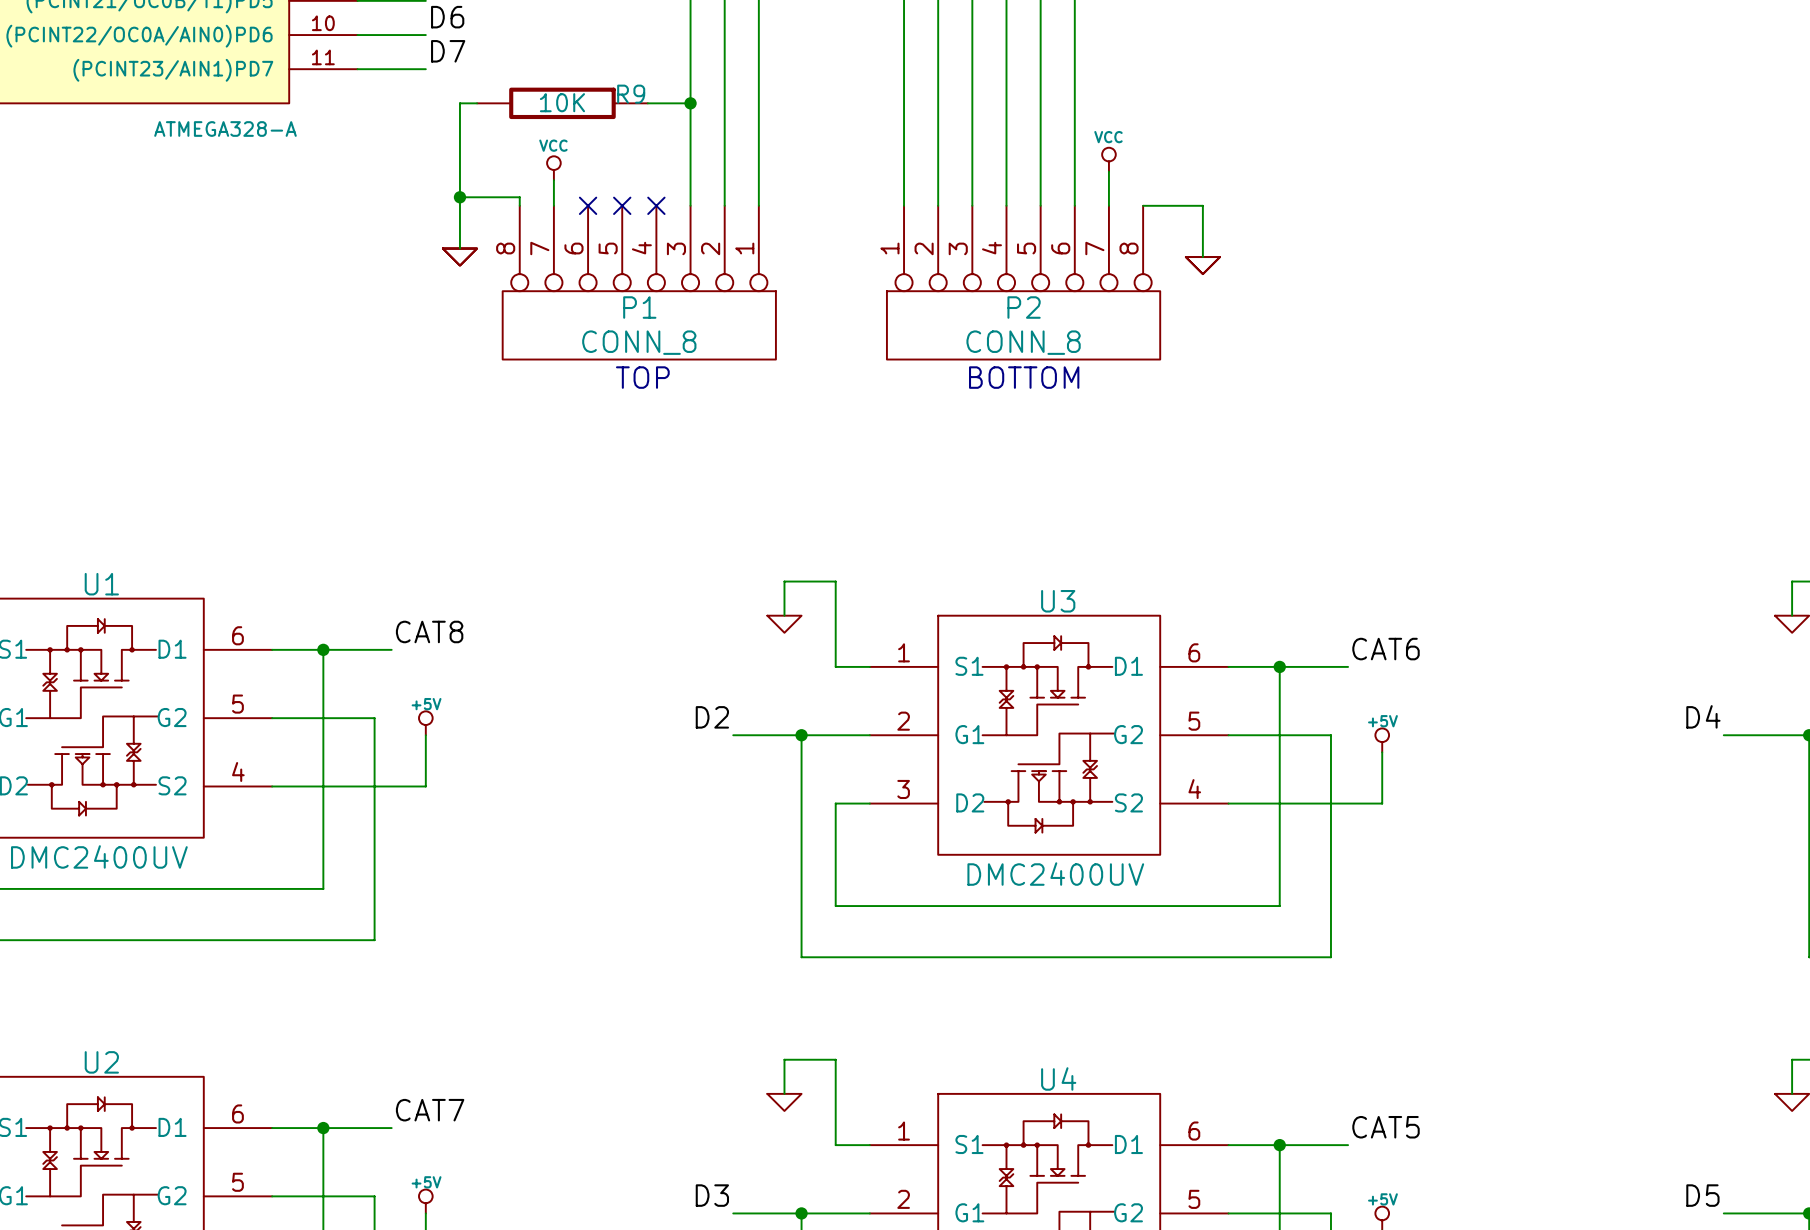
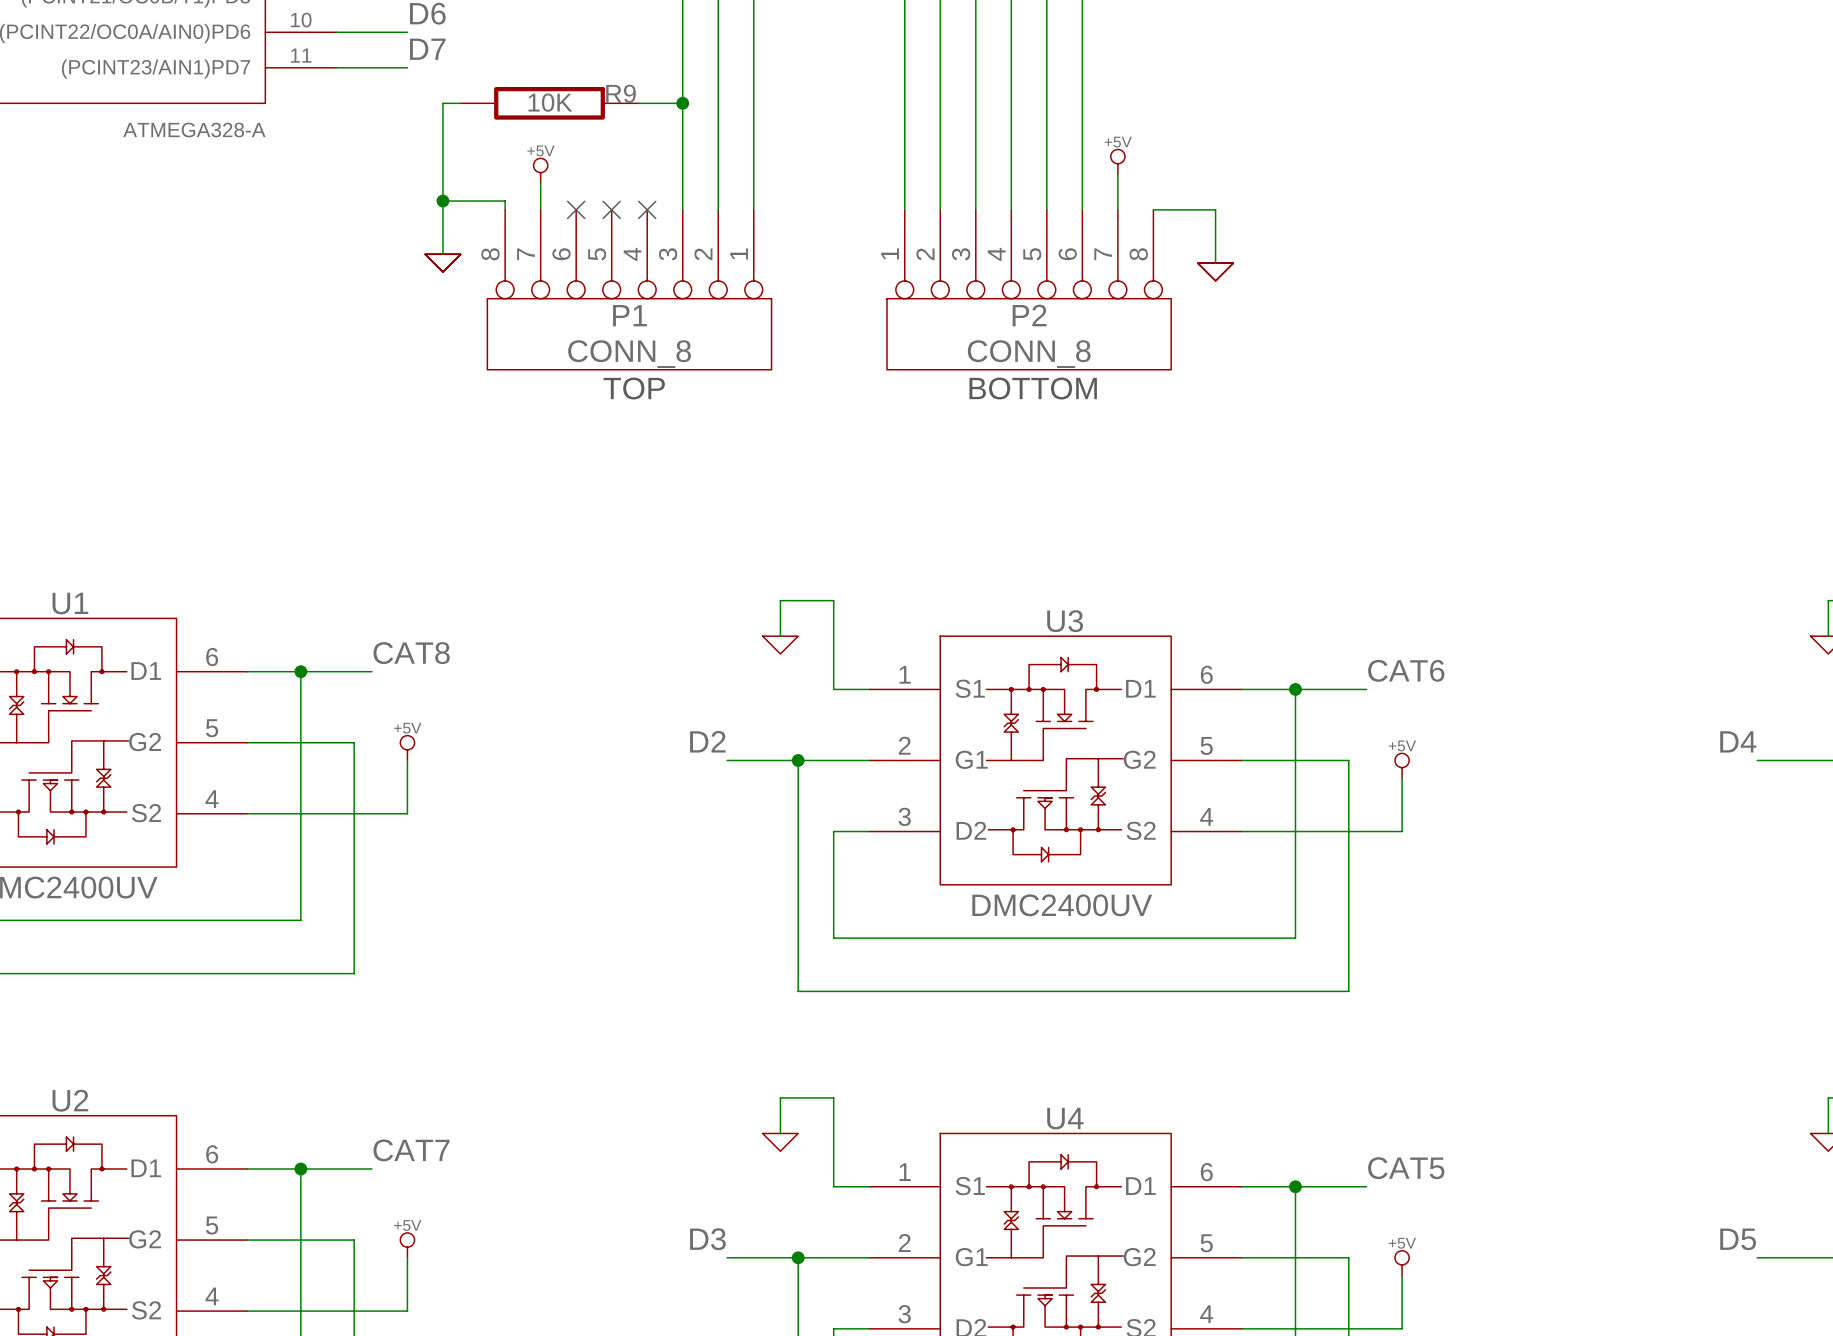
power symbol: VCC (1108, 159) -> +5V (1117, 161)
power symbol: VCC (553, 168) -> +5V (540, 170)

